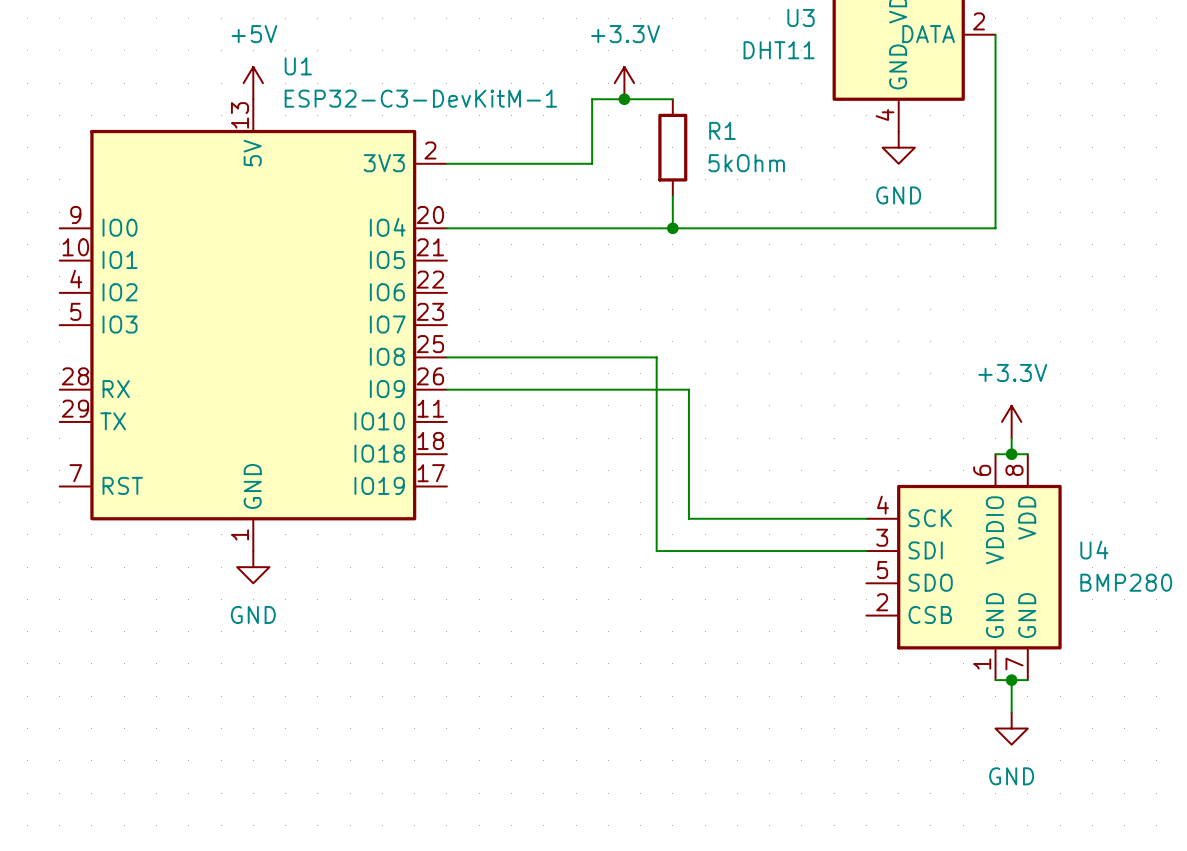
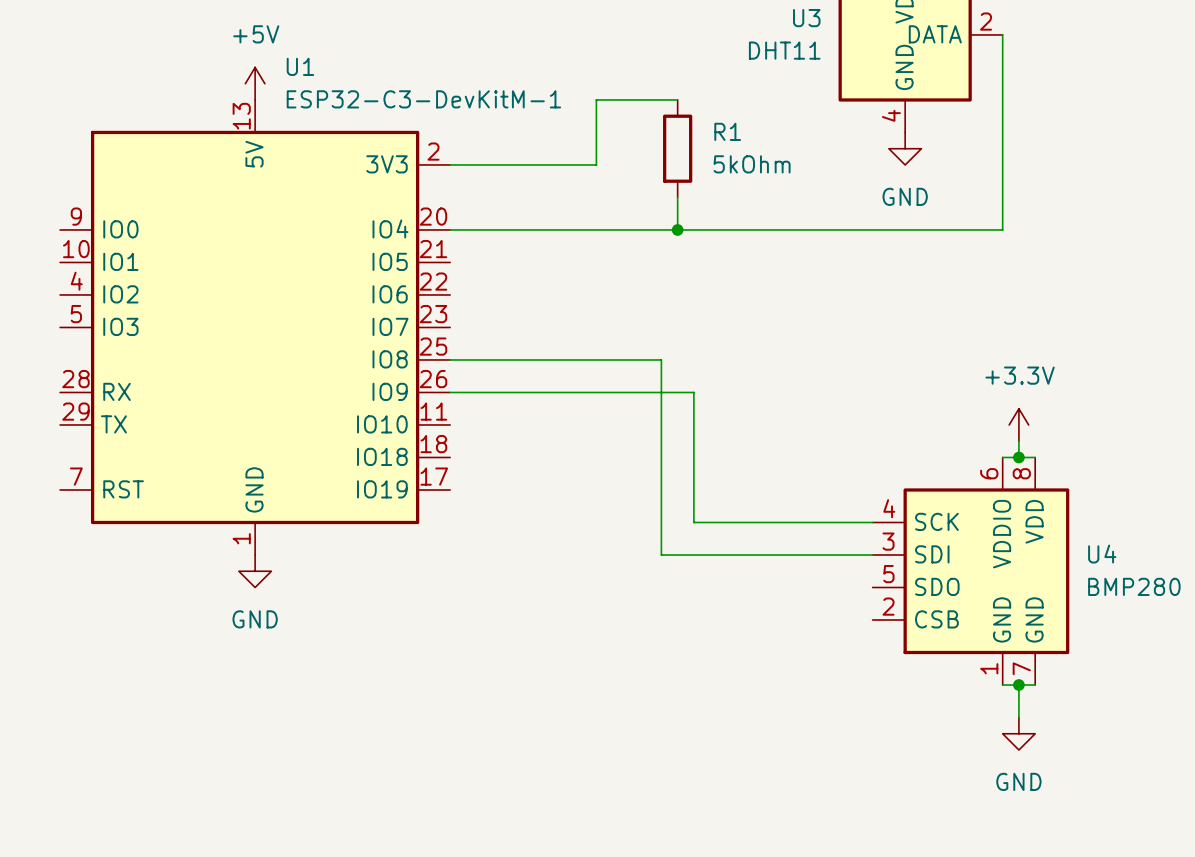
power symbol: +3.3V (624, 83) -> none
junction: (624, 99) -> none

